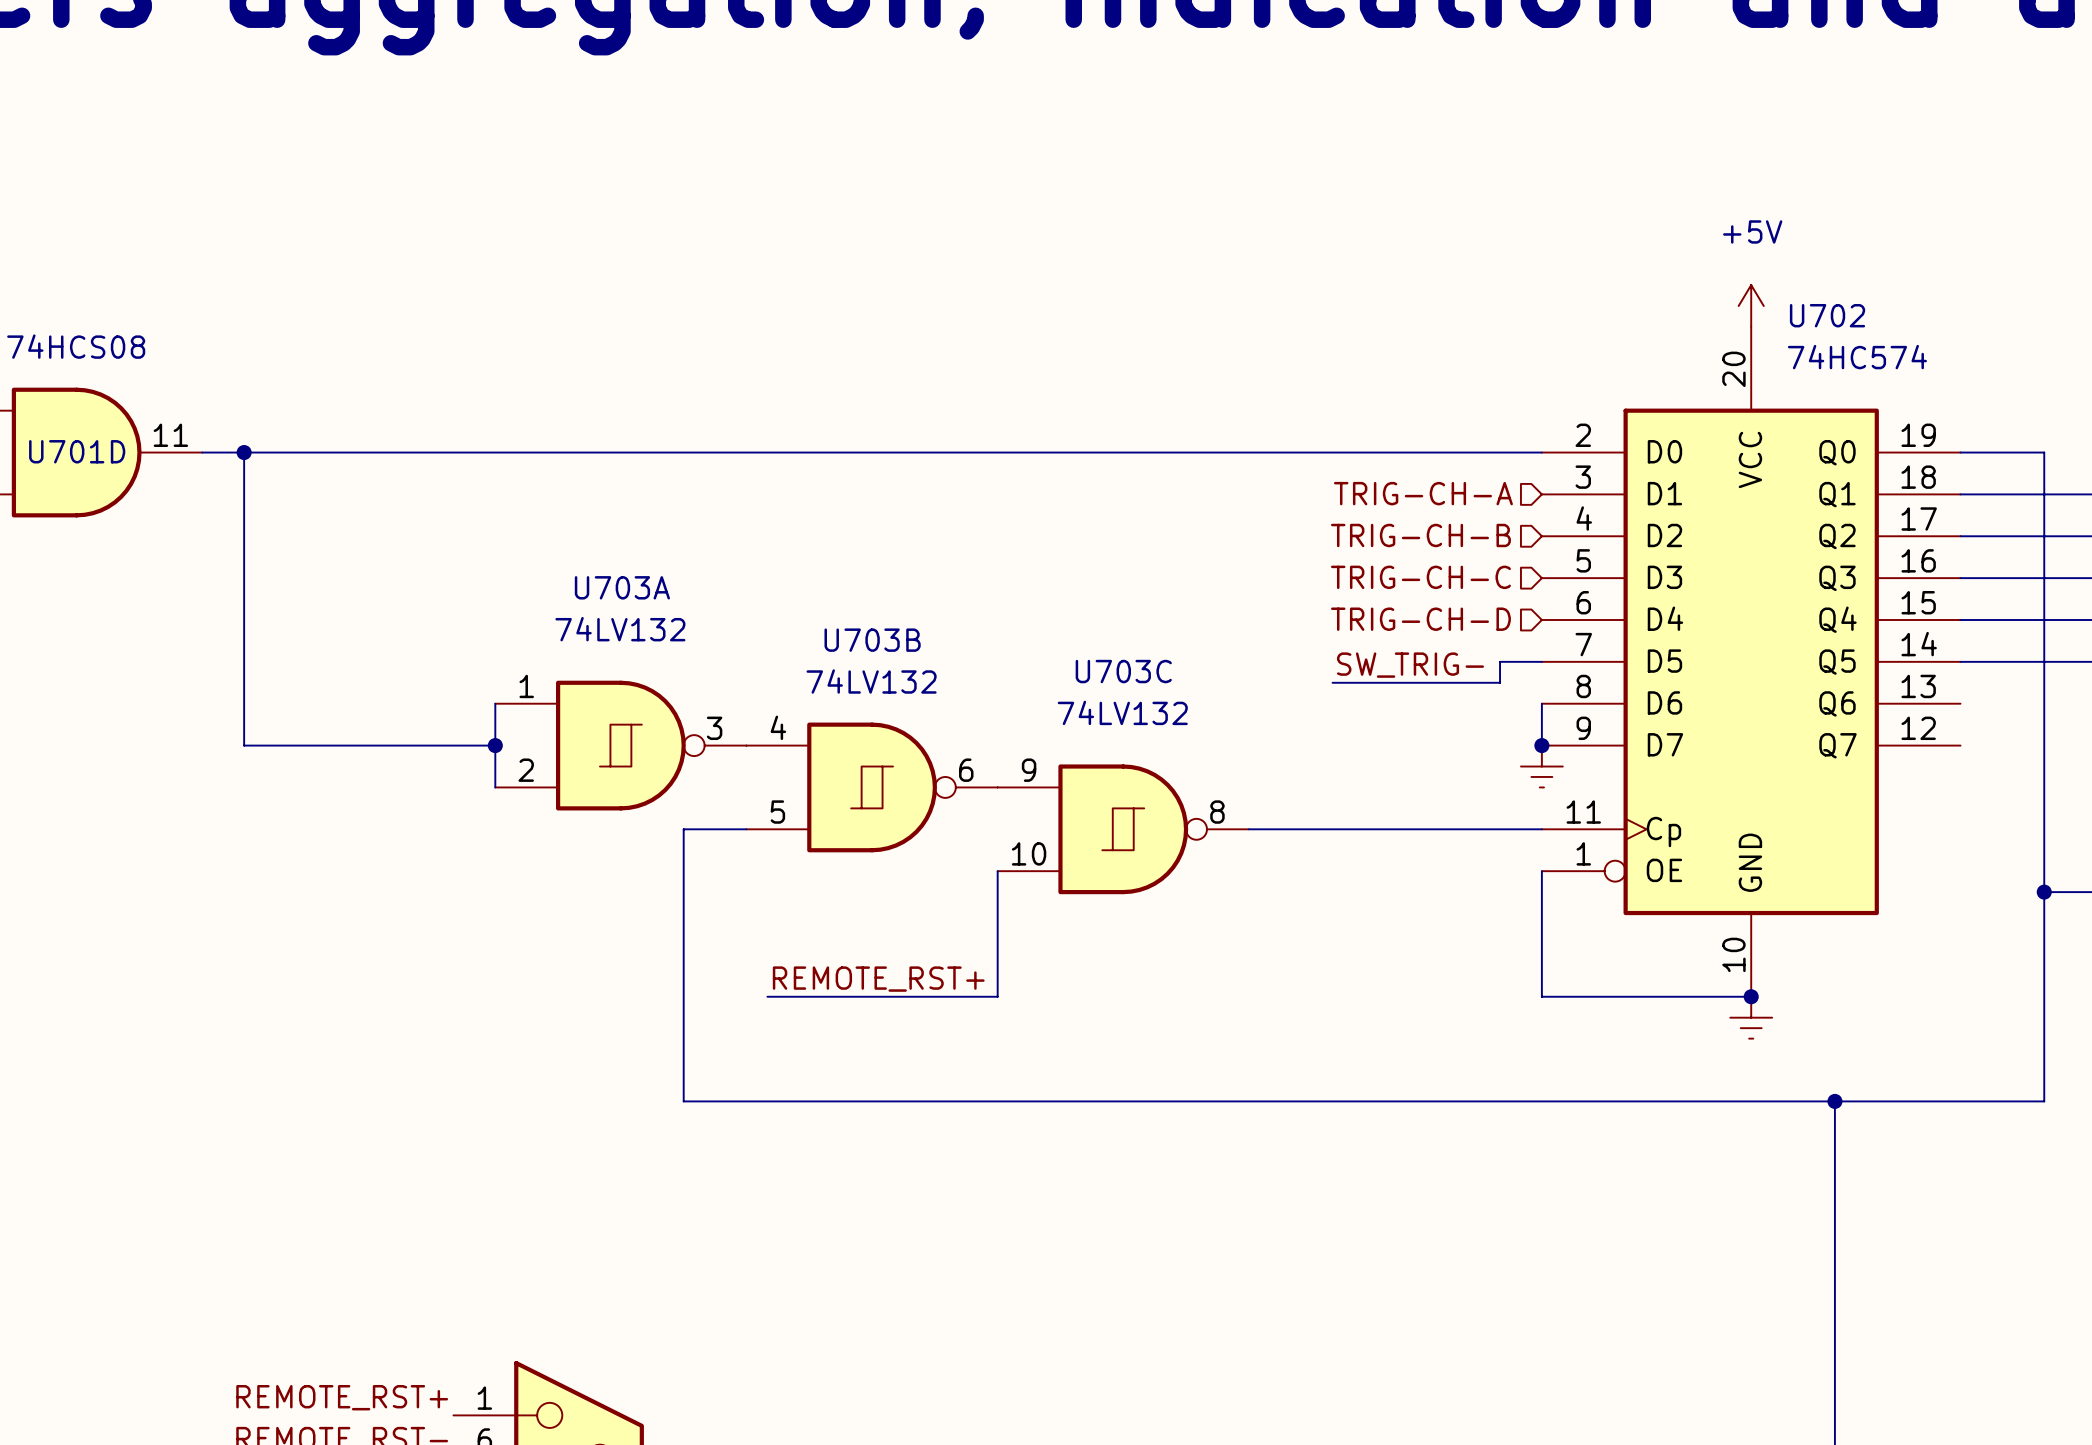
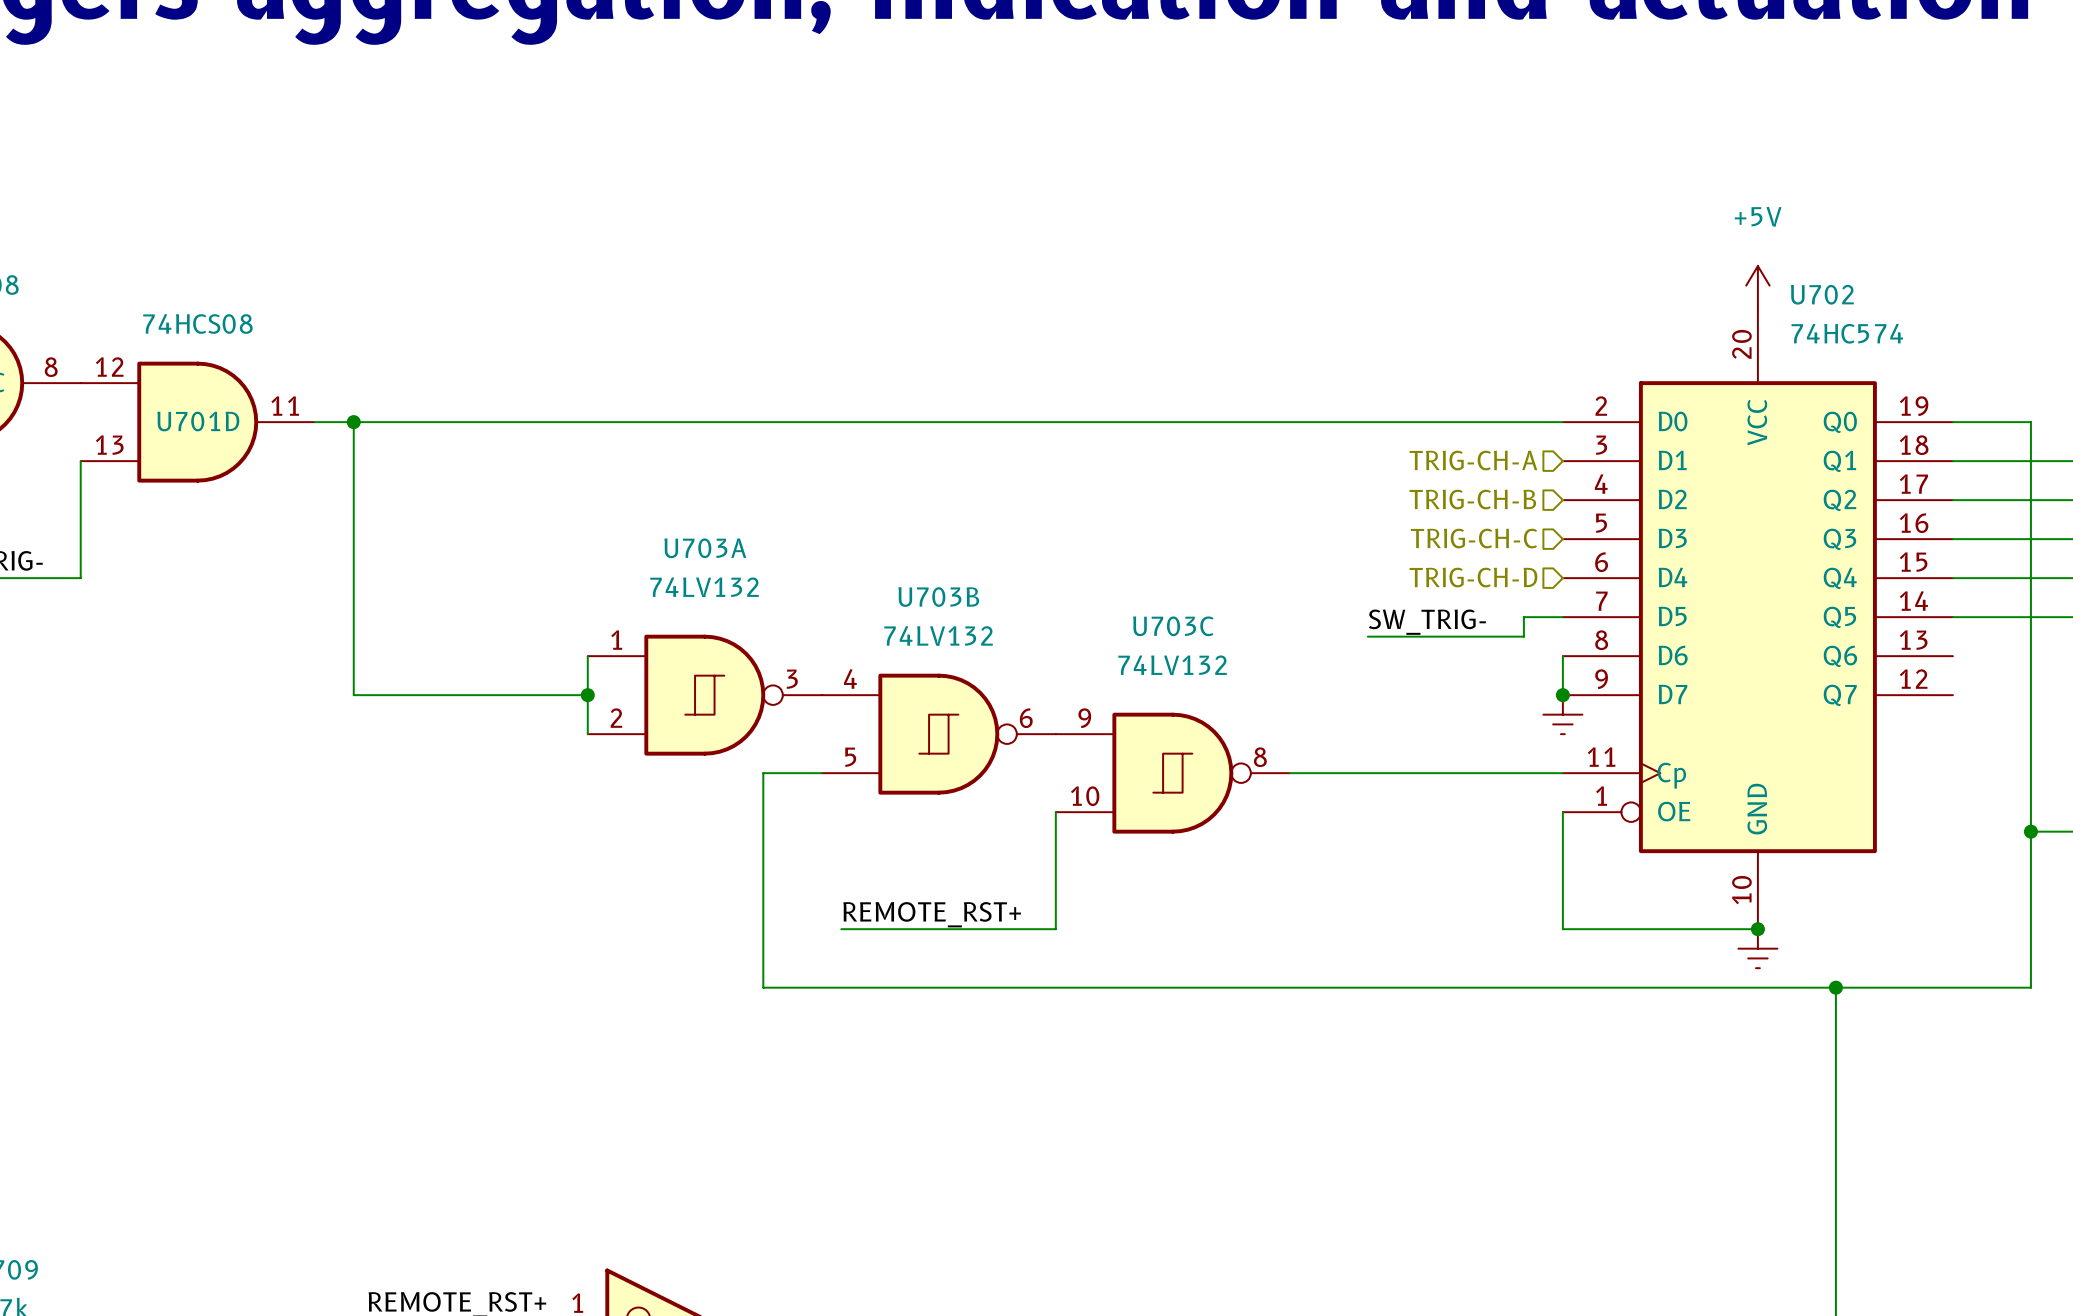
wire: (683, 1059) (683, 1101) (2044, 1101) (2044, 1059) -> (763, 987) (2030, 987)
wire: none -> (1835, 987) (1835, 1026)
junction position: (1834, 1101) -> (1835, 987)

